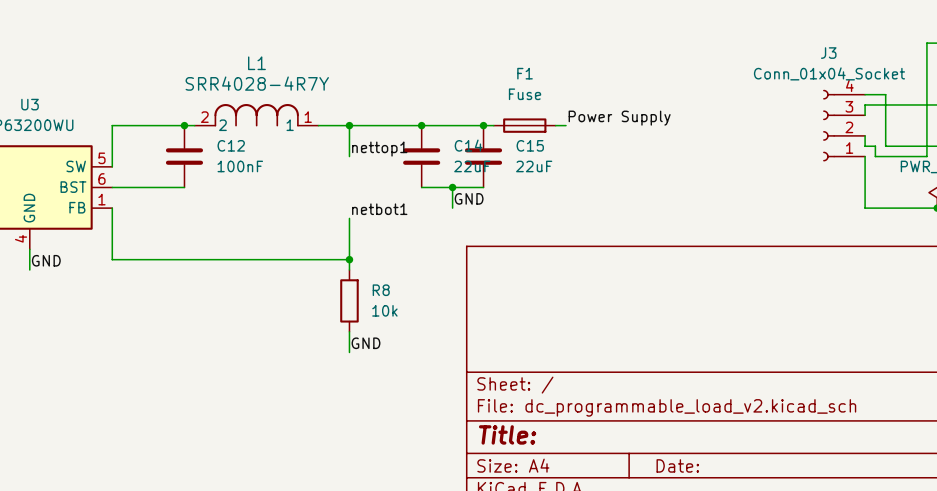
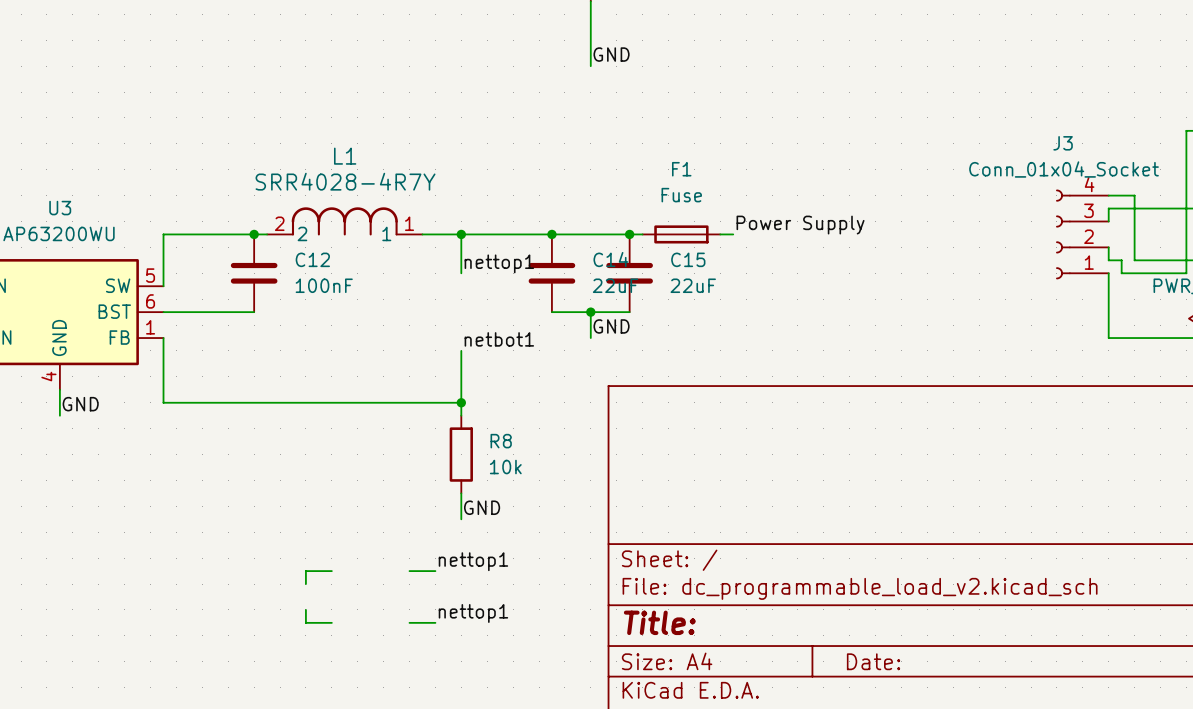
label: none -> nettop1 (473, 561)
wire: none -> (331, 571) (305, 571) (305, 584)
wire: none -> (409, 571) (435, 571)
wire: none -> (305, 609) (305, 622) (331, 622)
label: none -> nettop1 (473, 613)
wire: none -> (409, 622) (435, 622)

